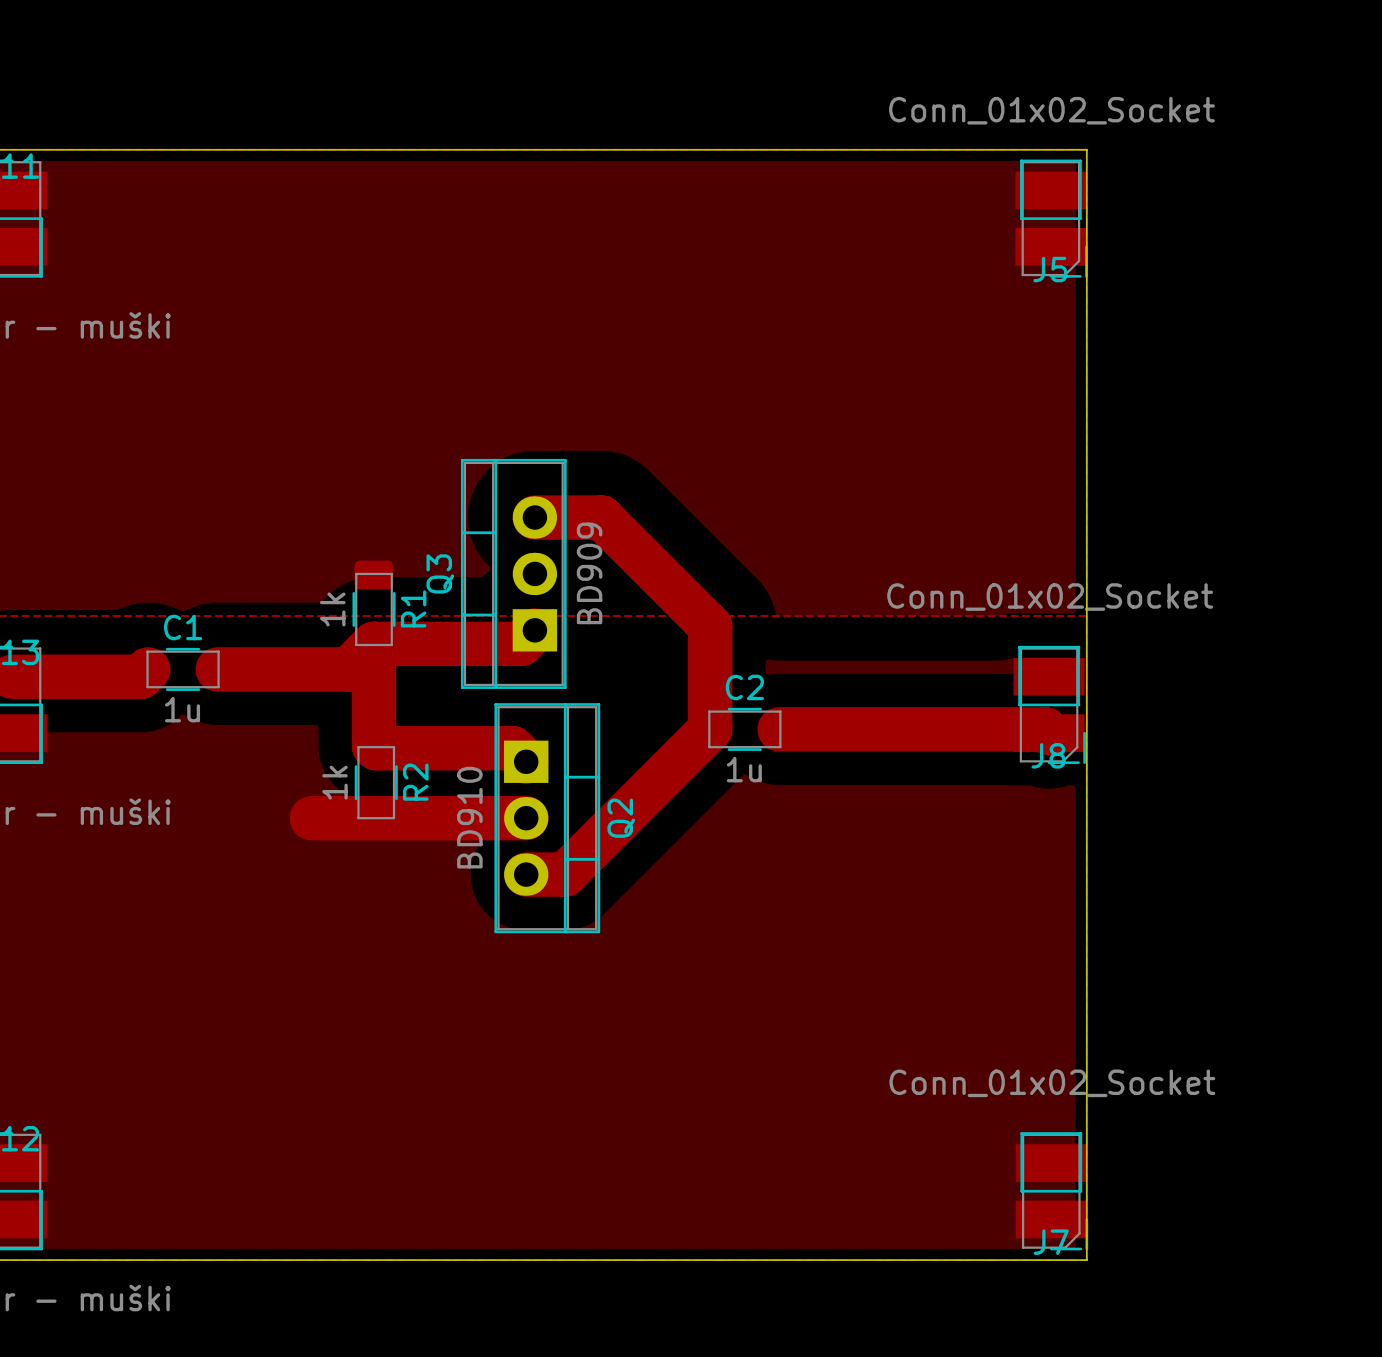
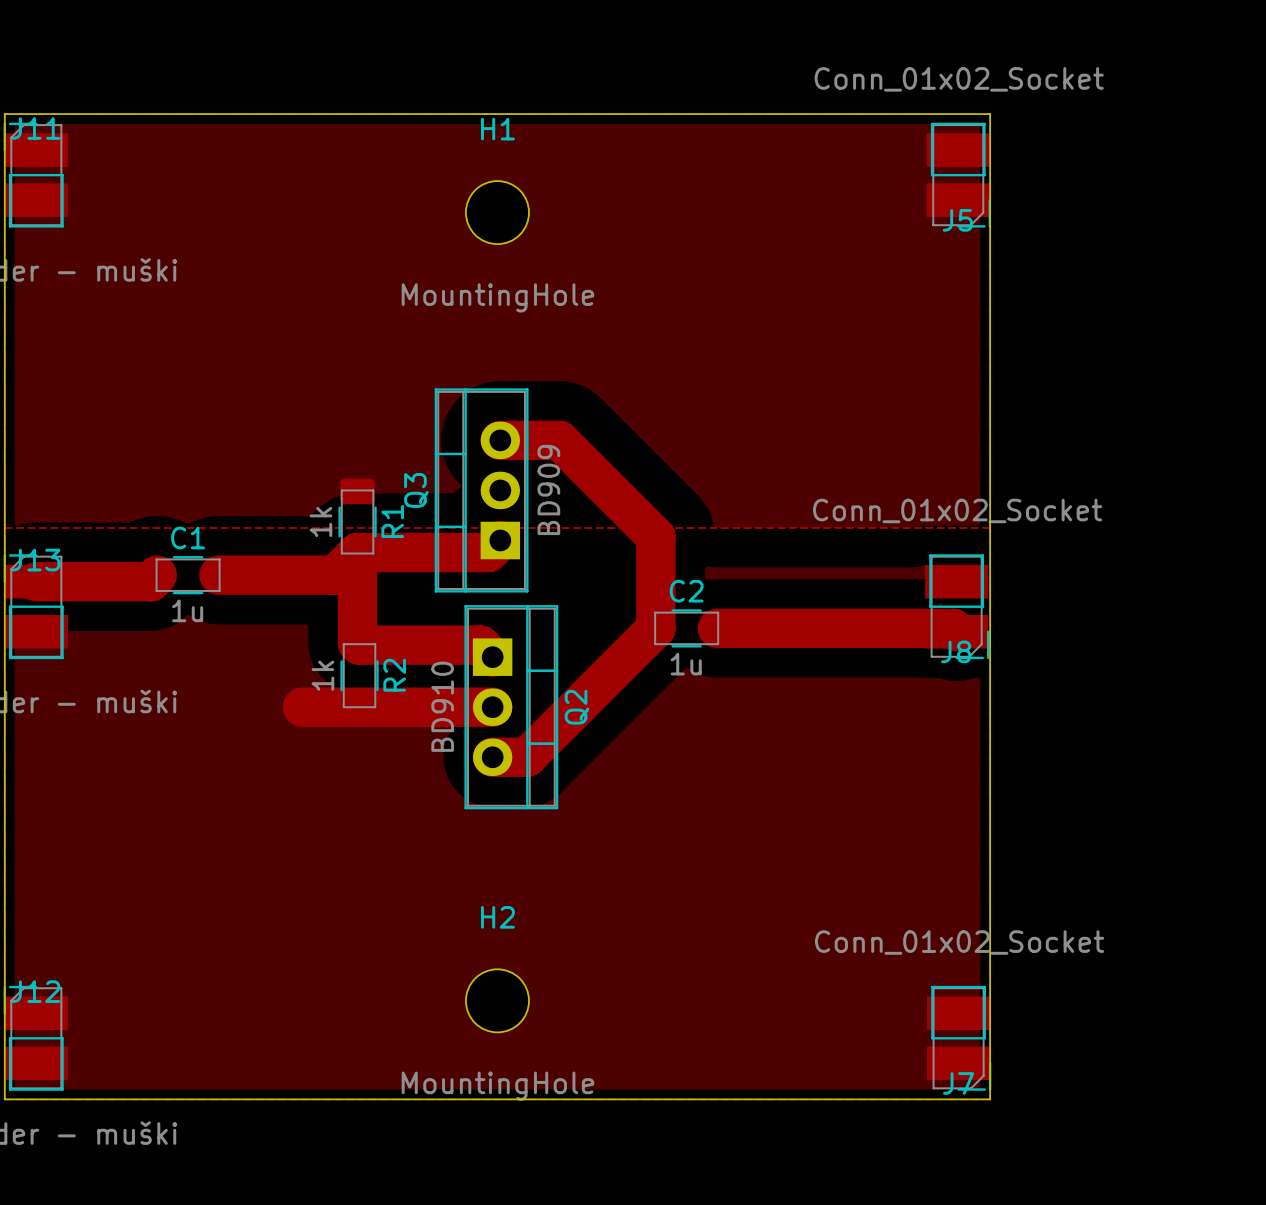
H1: none -> MountingHole (497, 212)
H2: none -> MountingHole (497, 1000)

